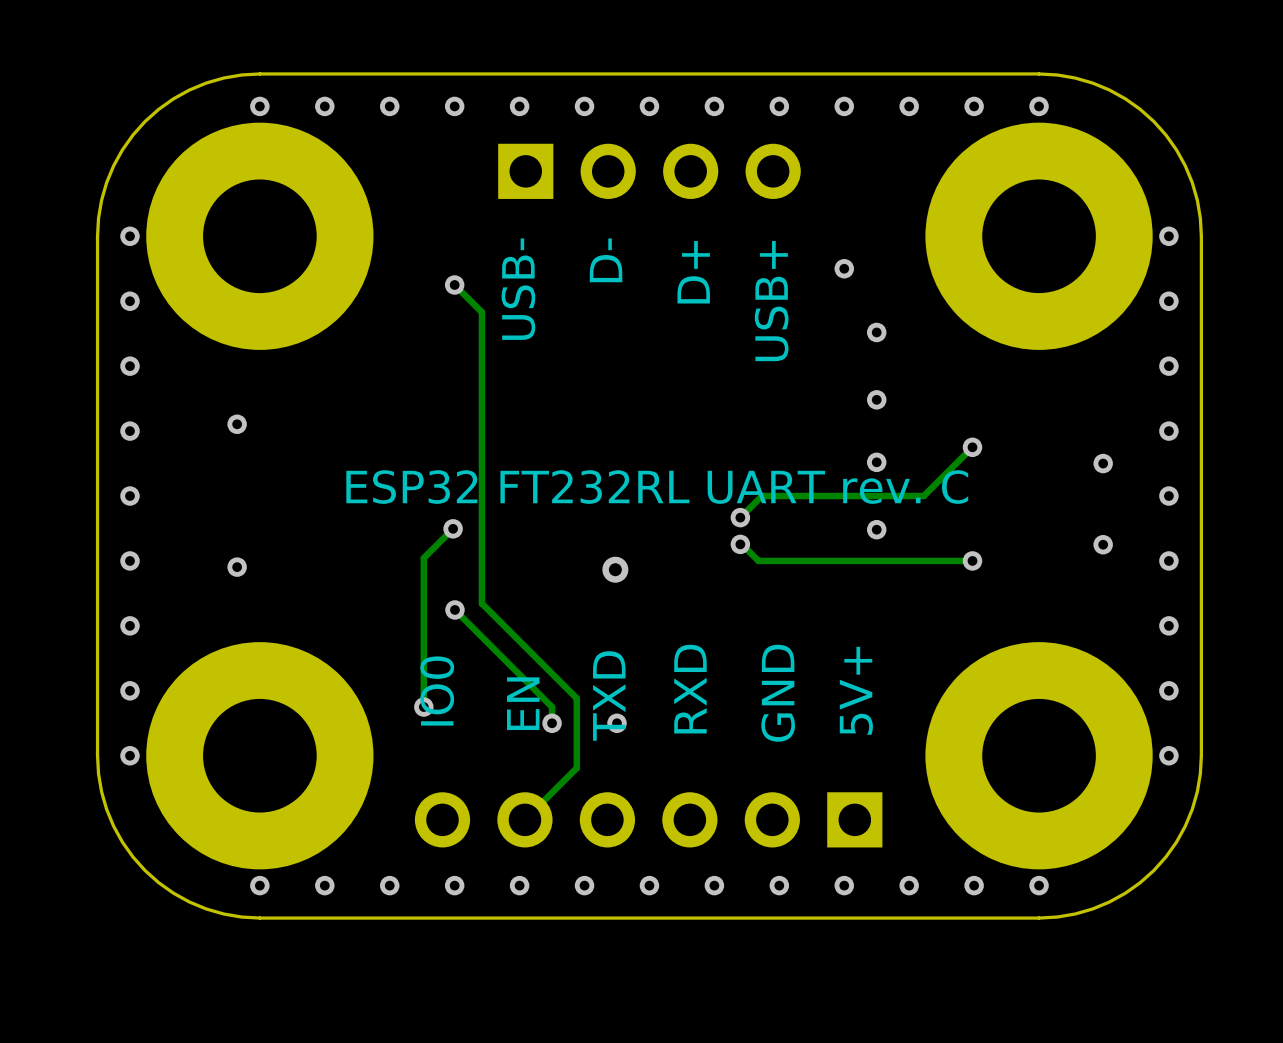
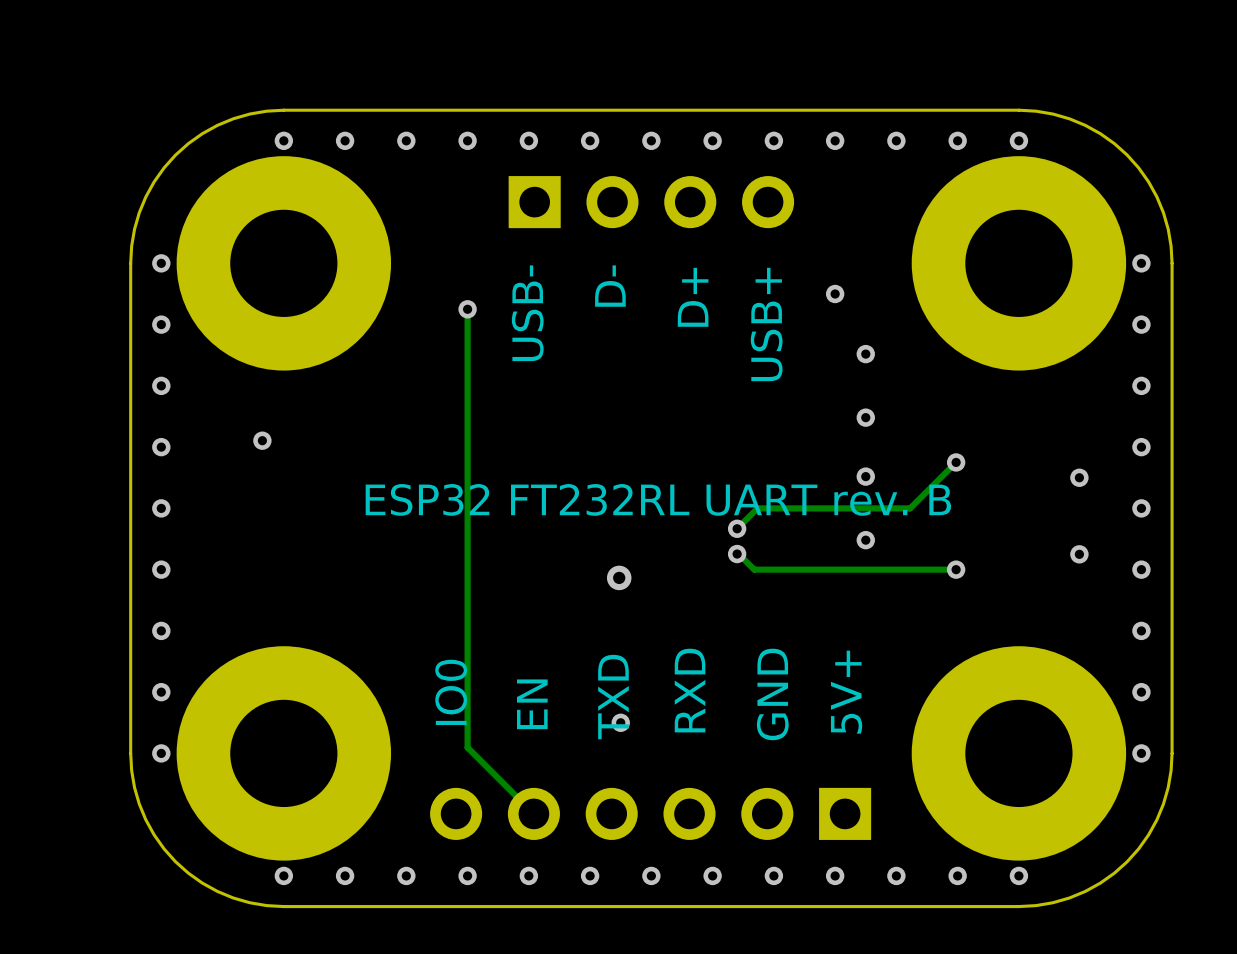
track: (454, 284) (481, 312) (481, 603) (576, 698) (576, 768) (524, 819) -> (467, 309) (467, 747) (533, 813)
text: ESP32 FT232RL UART rev. C (657, 487) -> ESP32 FT232RL UART rev. B (658, 499)
track: (453, 528) (423, 558) (423, 707) -> none
via: (453, 528) -> none
via: (237, 567) -> none
track: (454, 609) (552, 707) (552, 723) -> none
via: (454, 609) -> none
via: (423, 707) -> none
via: (552, 723) -> none

